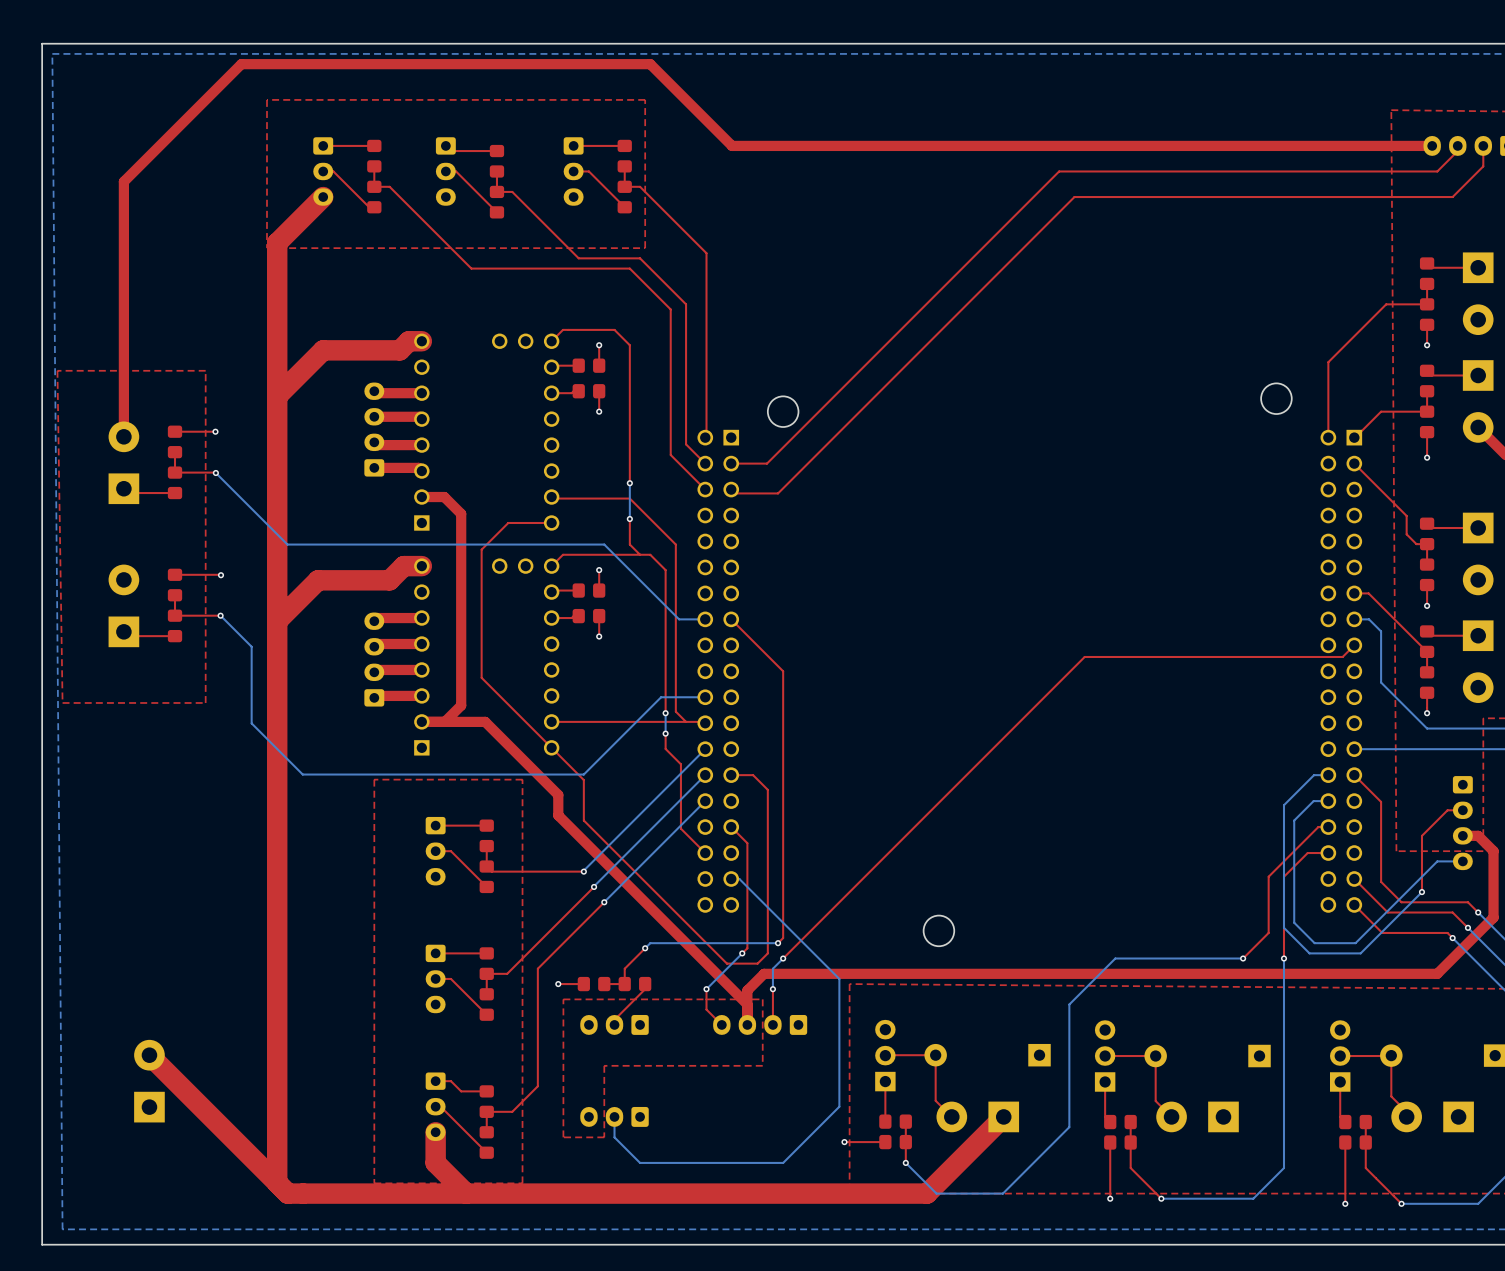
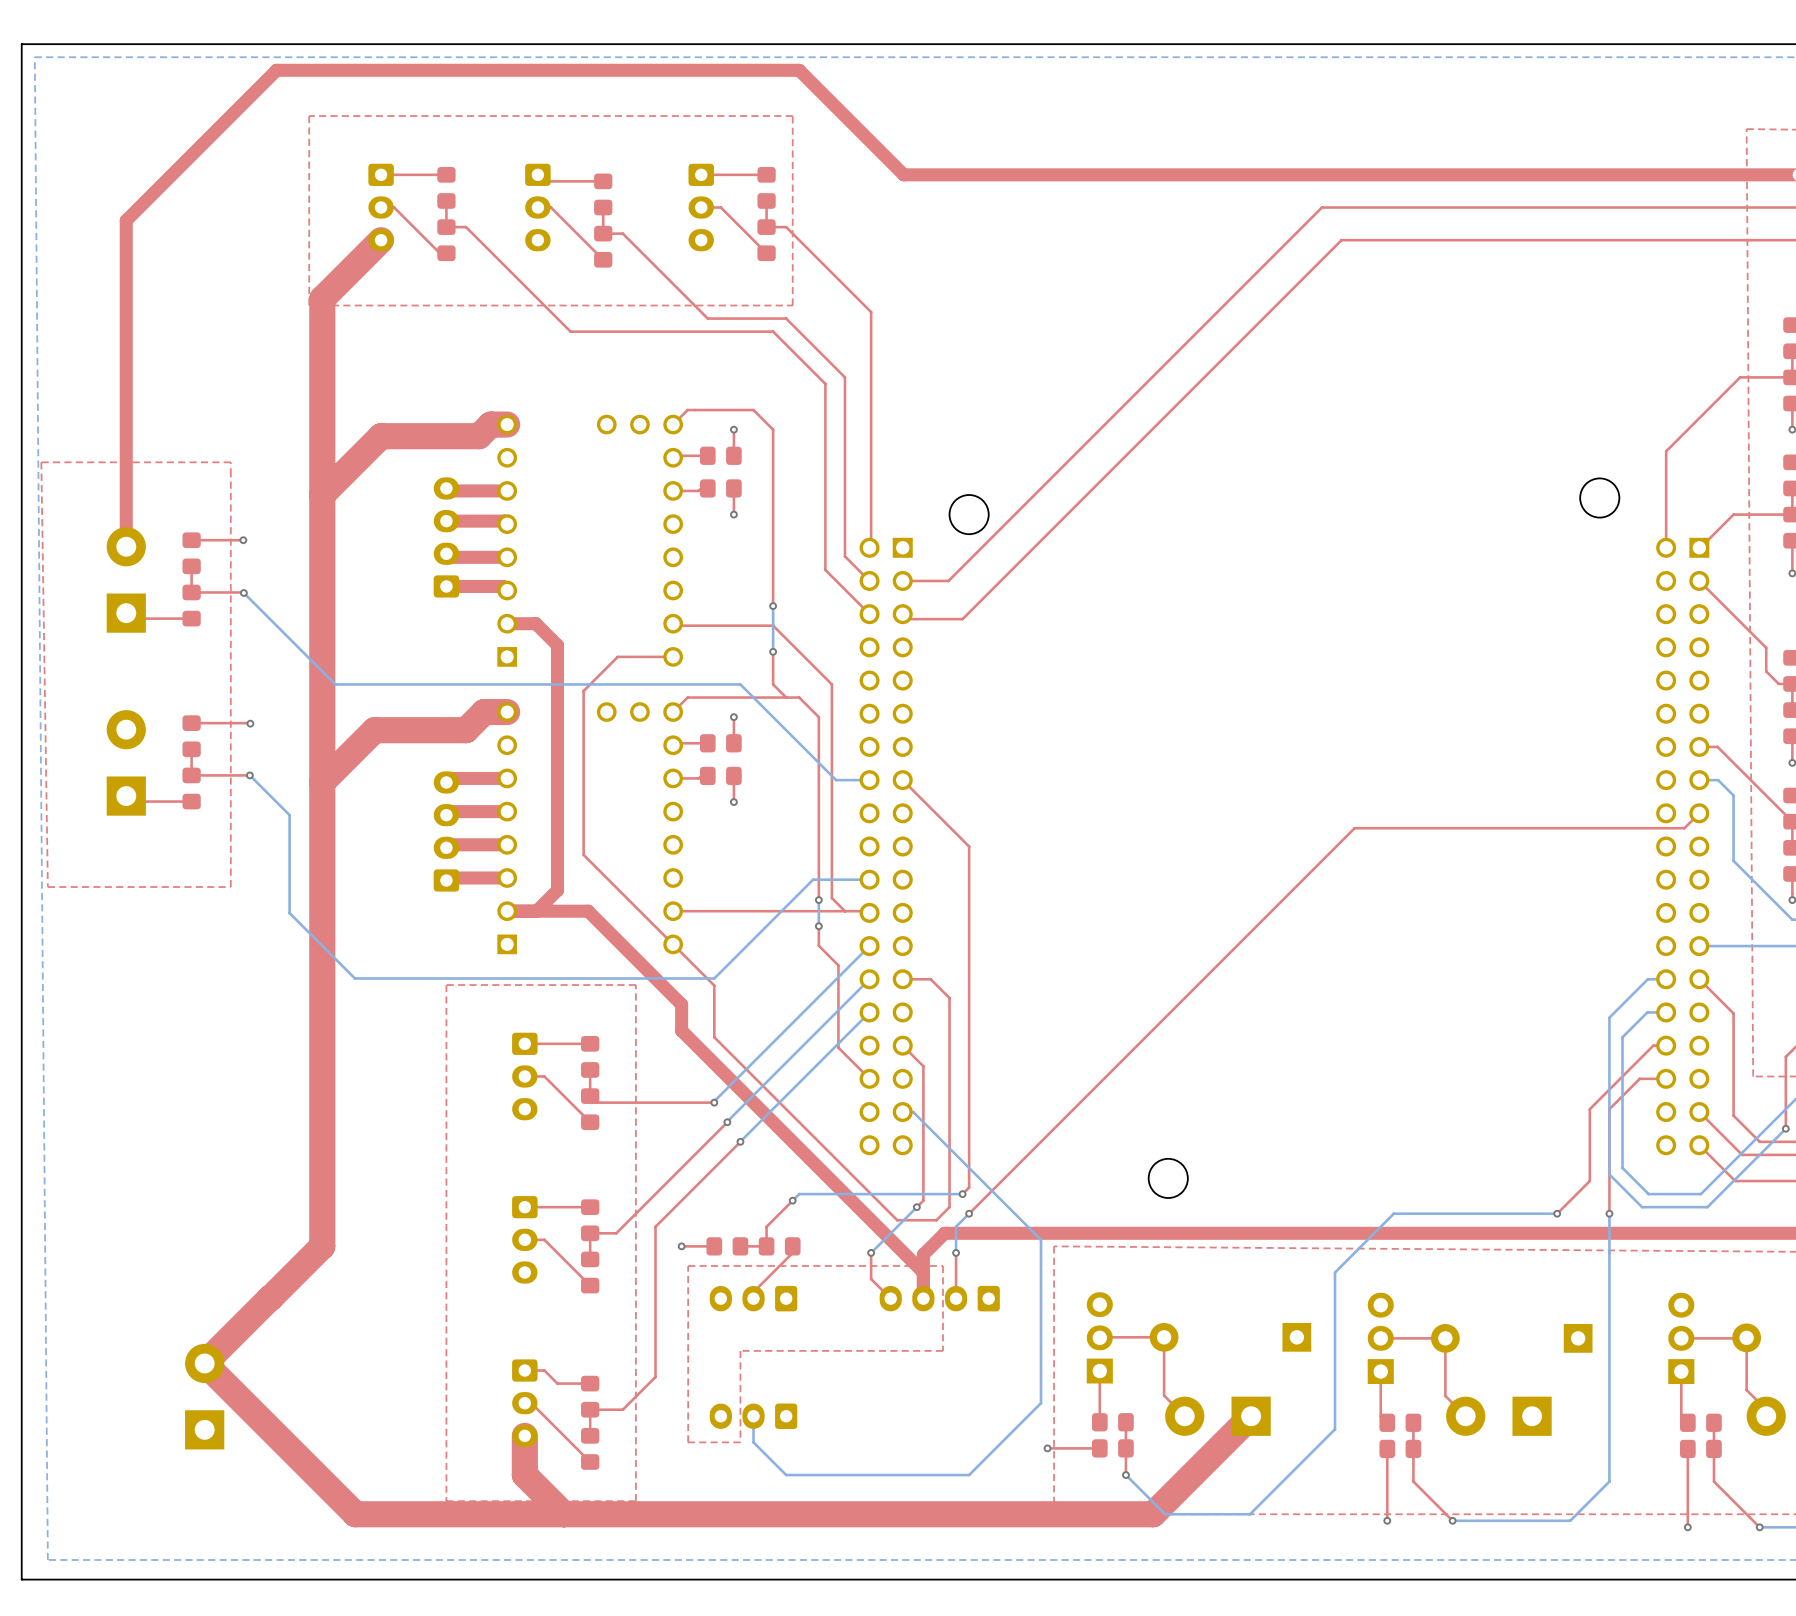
top track: (277, 984) (277, 1182) -> (322, 1246) (204, 1363) (355, 1514)
top track: (149, 1055) (287, 1193) (303, 1193) -> none
part position: (149, 1081) -> (204, 1396)

